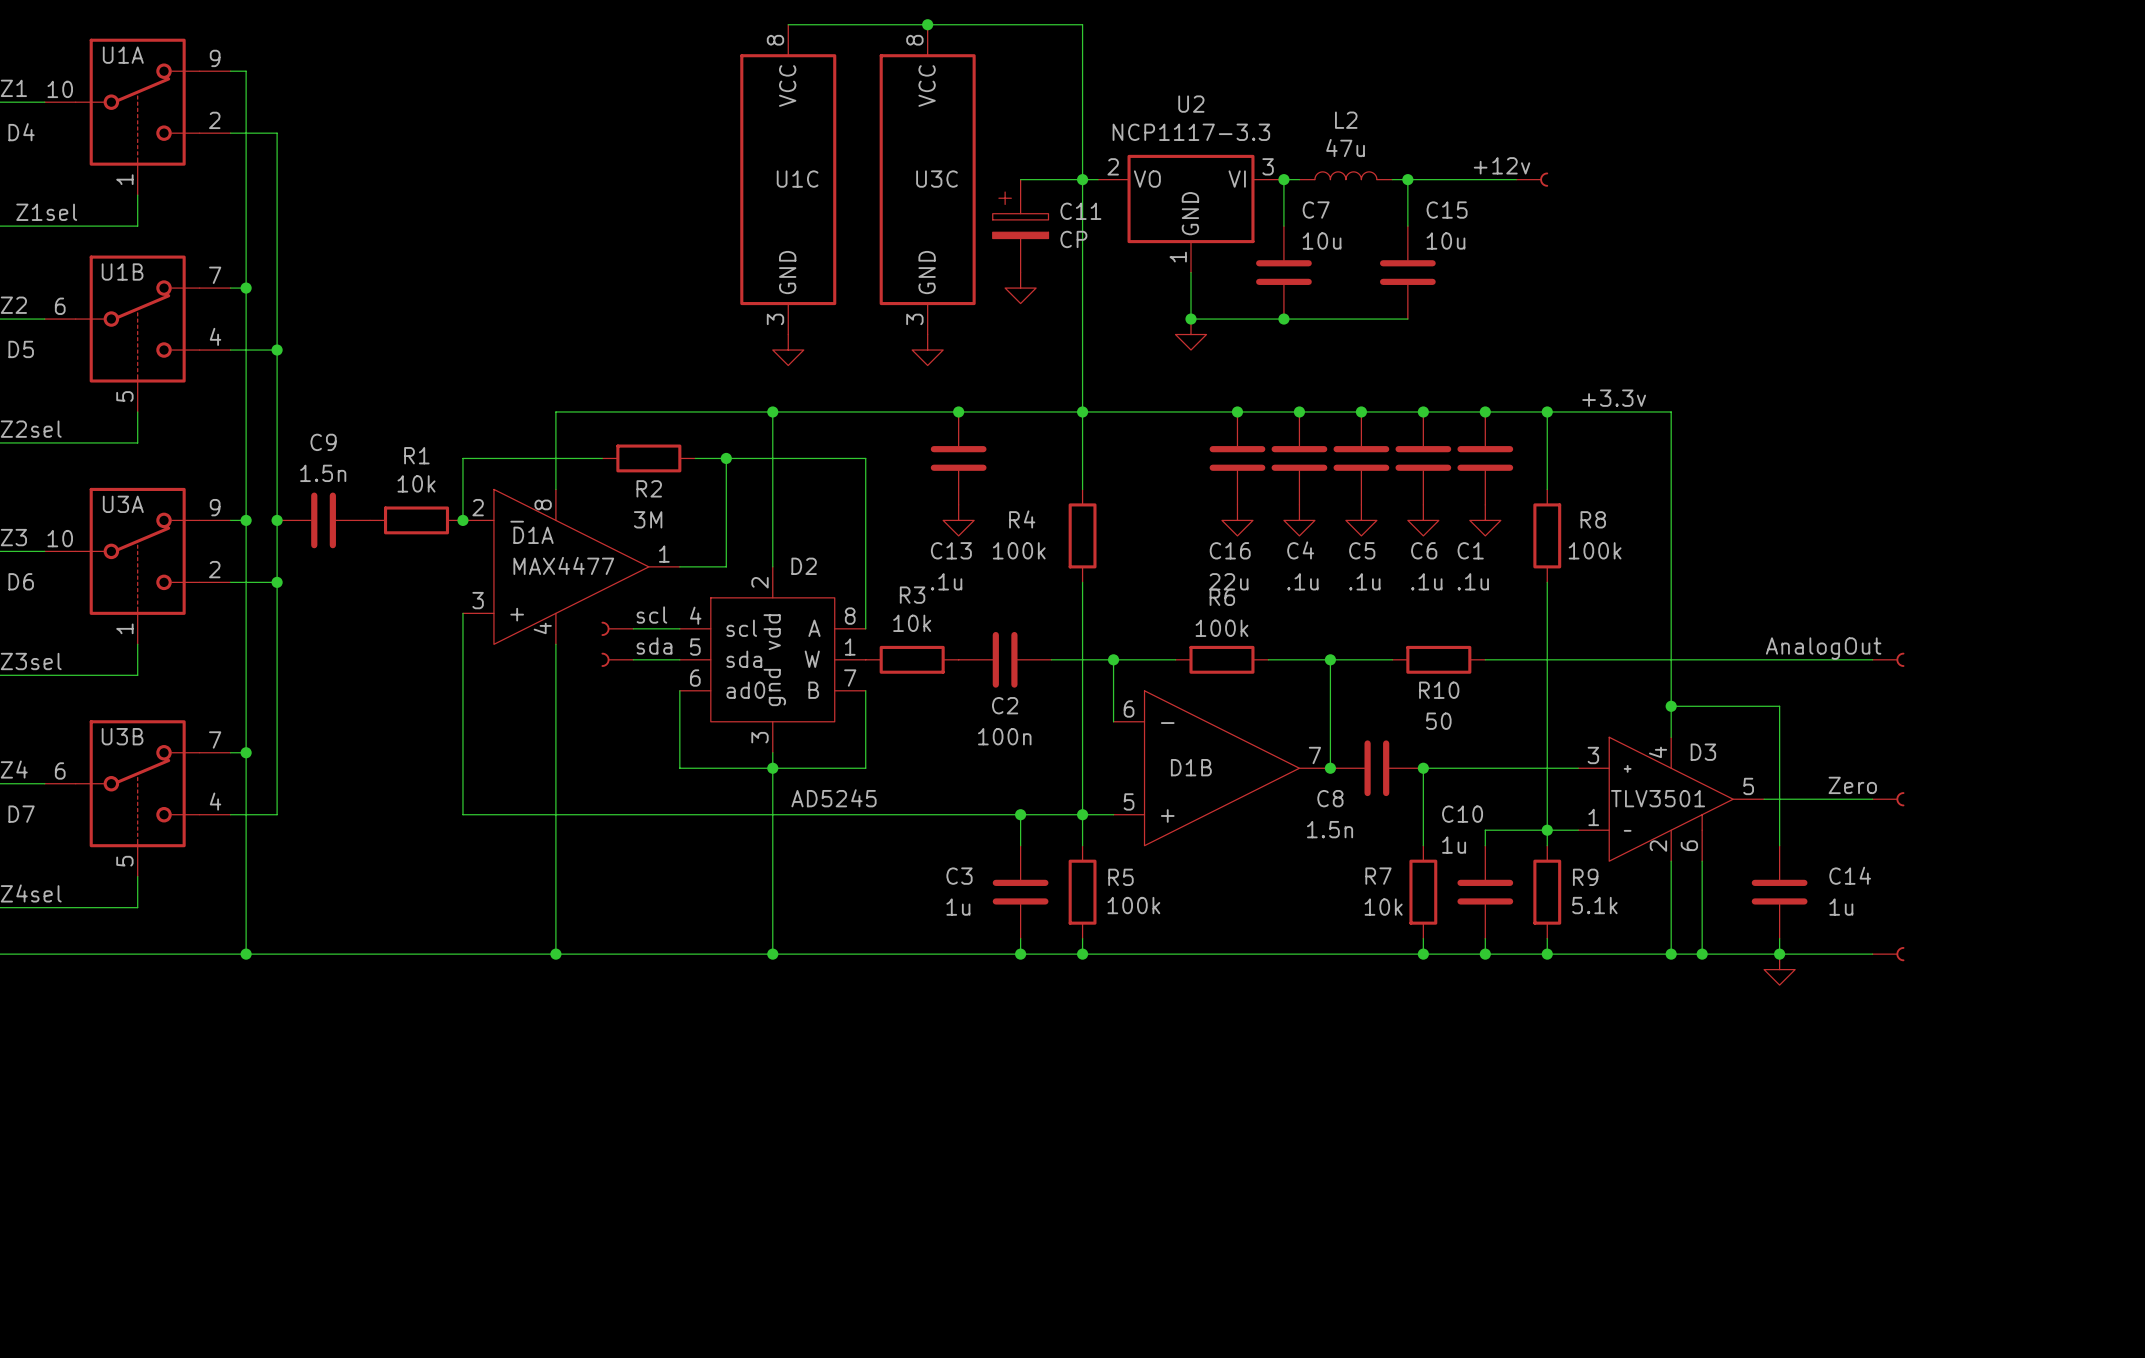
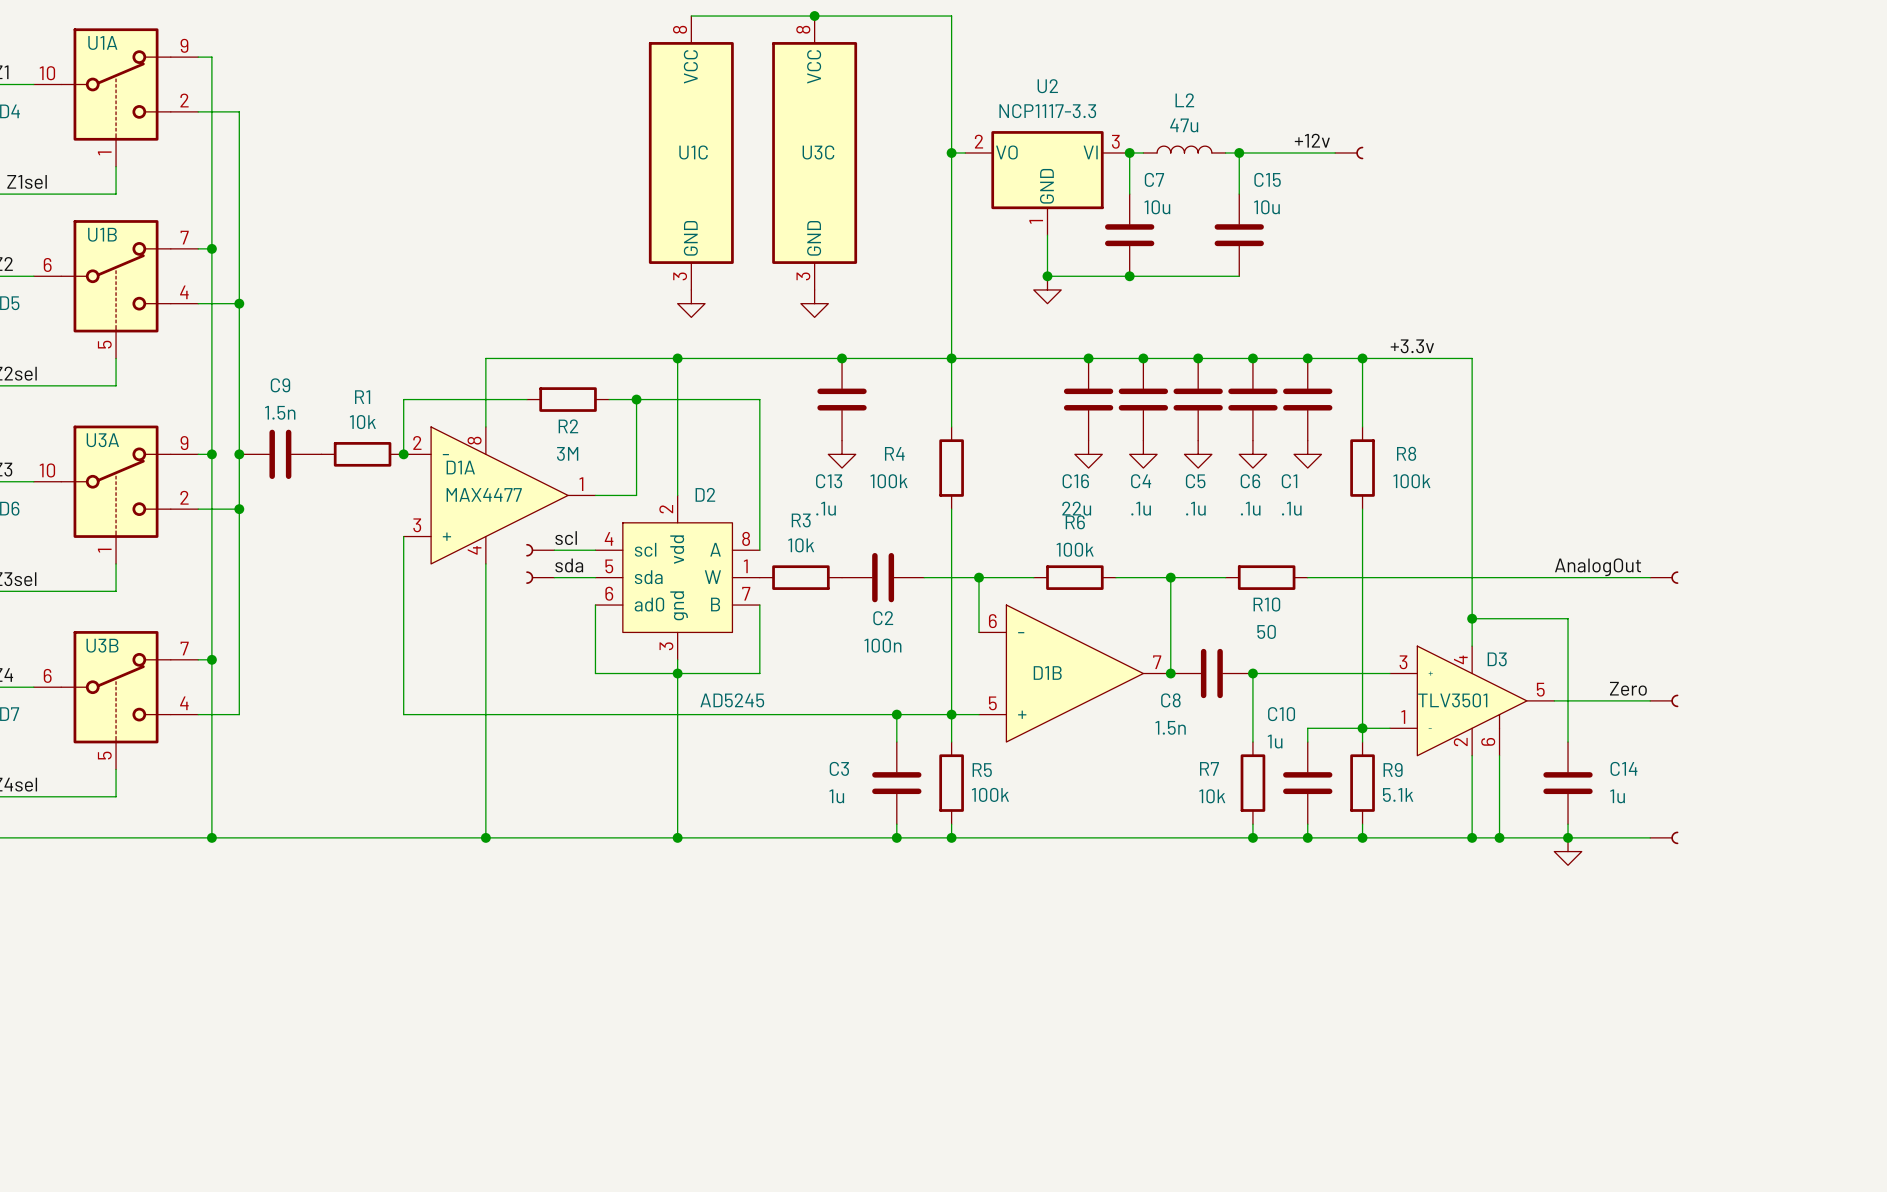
wire: (1020, 179) (1082, 179) -> none
C11: CP (1020, 226) -> none
power symbol: (1020, 288) -> none

